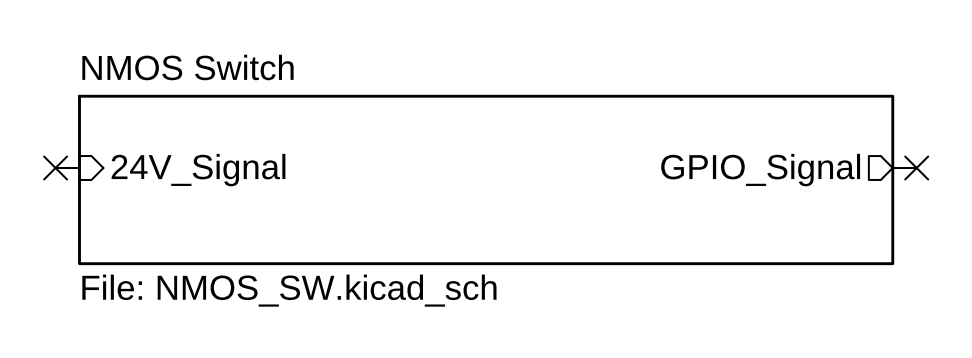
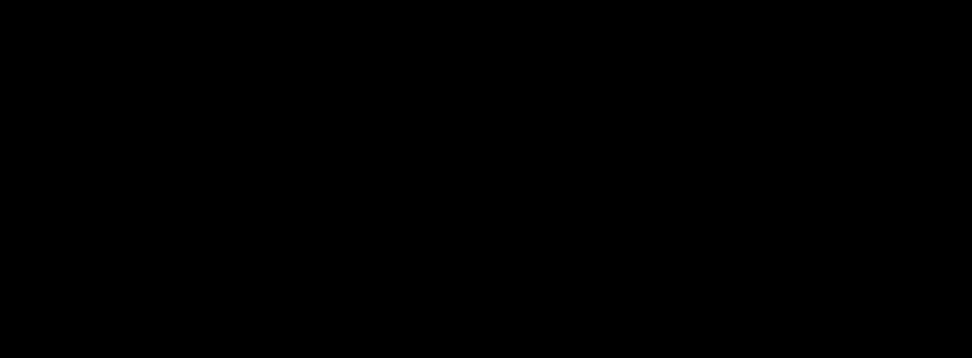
wire: (55, 168) (79, 168) -> none
no-connect mark: (55, 168) -> none
wire: (892, 168) (916, 168) -> none
no-connect mark: (916, 168) -> none
sheet pin: 24V_Signal (198, 170) -> none
sheet pin: GPIO_Signal (760, 170) -> none
sheet NMOS Switch: File: NMOS_SW.kicad_sch (486, 179) -> none

